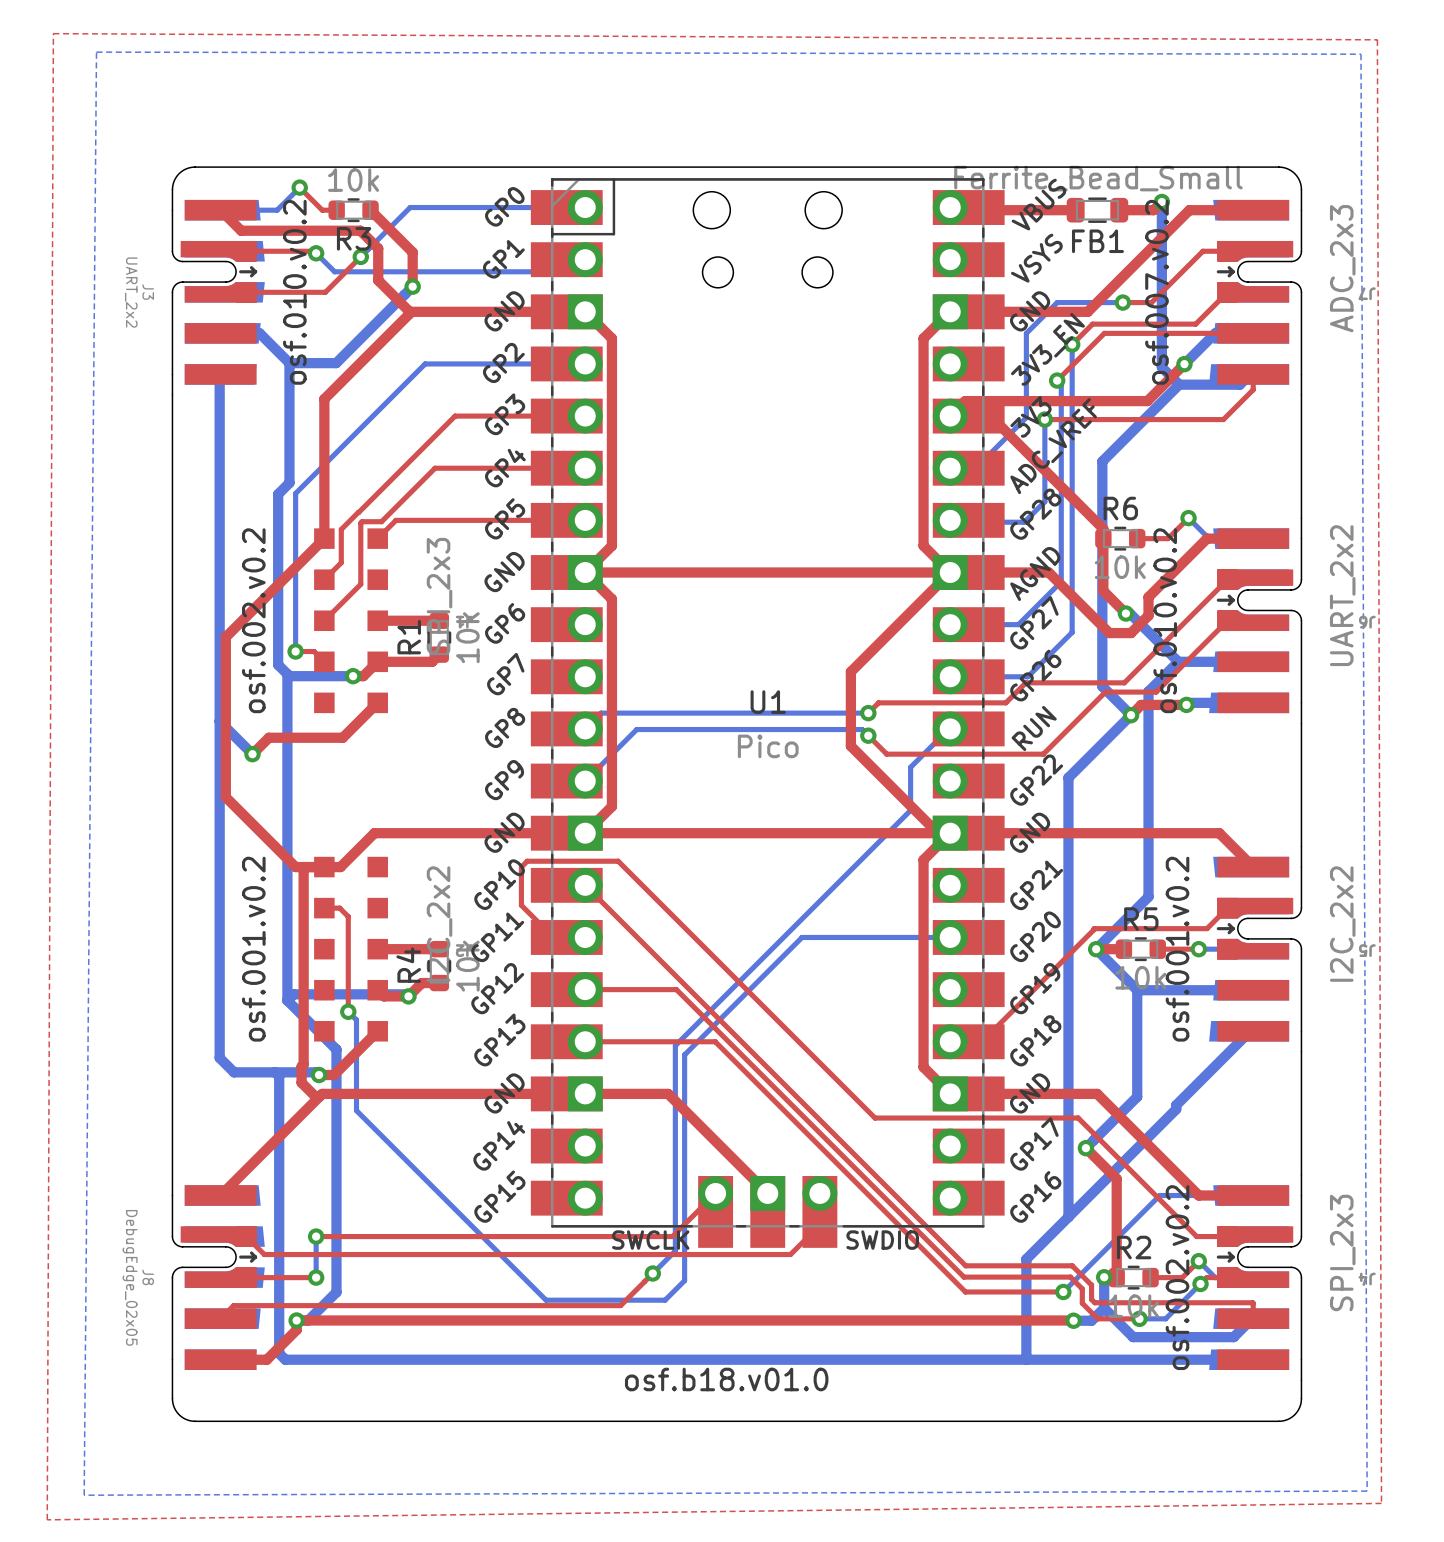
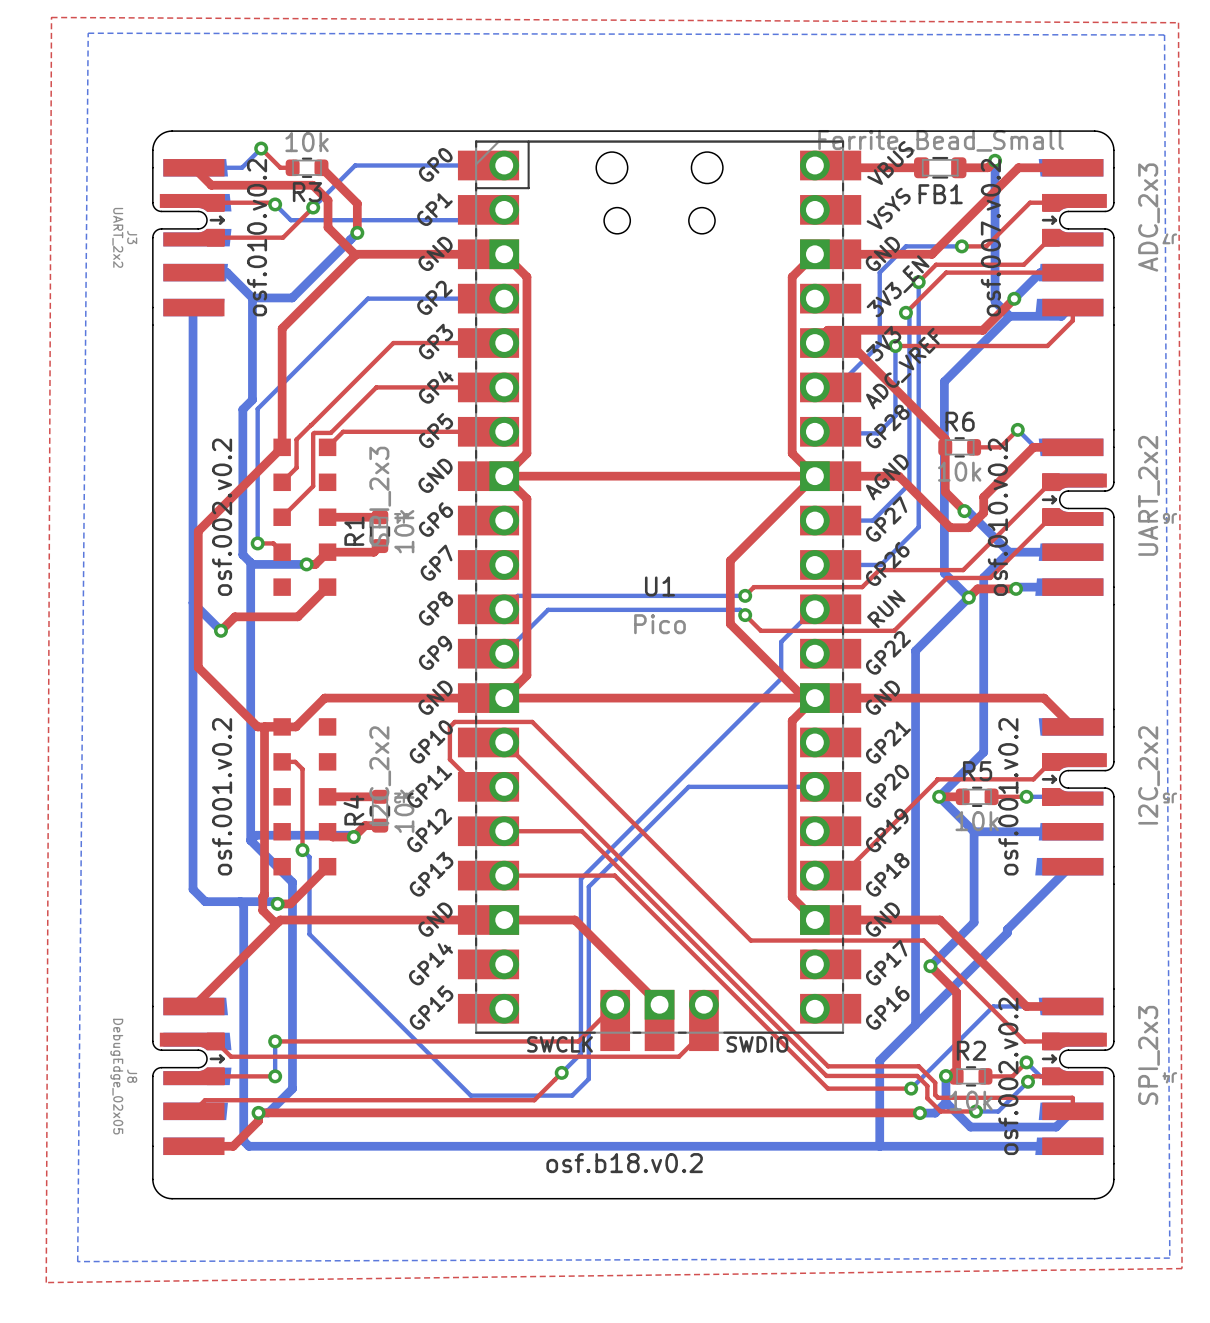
text: osf.b18.v01.0 (726, 1379) -> osf.b18.v0.2 (624, 1163)

